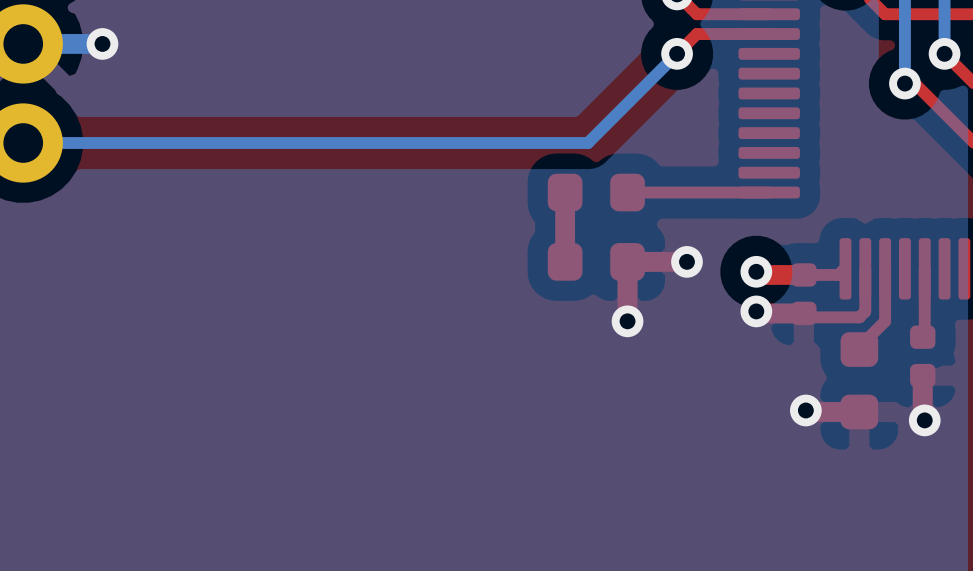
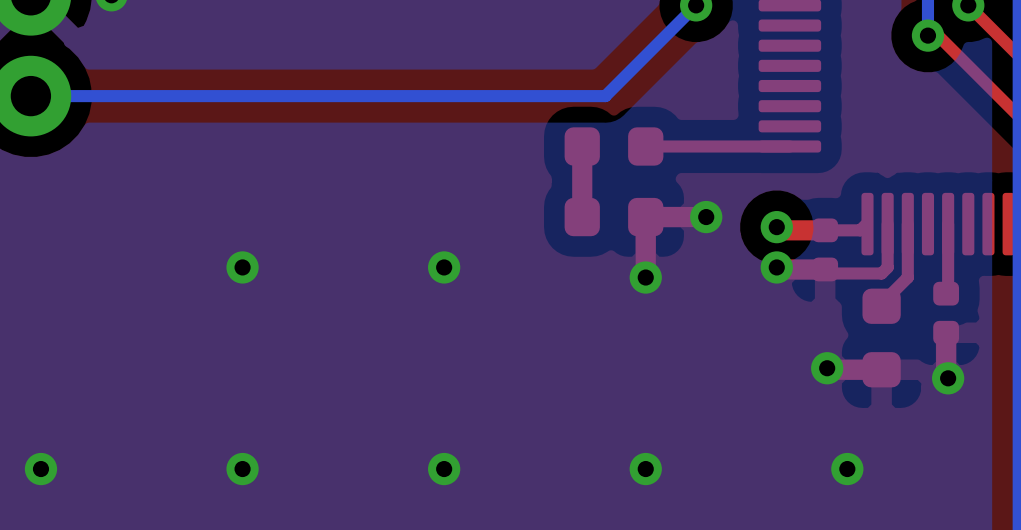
via: none -> (242, 267)
via: none -> (444, 267)
via: none -> (40, 469)
via: none -> (242, 469)
via: none -> (444, 469)
via: none -> (645, 469)
via: none -> (847, 469)

